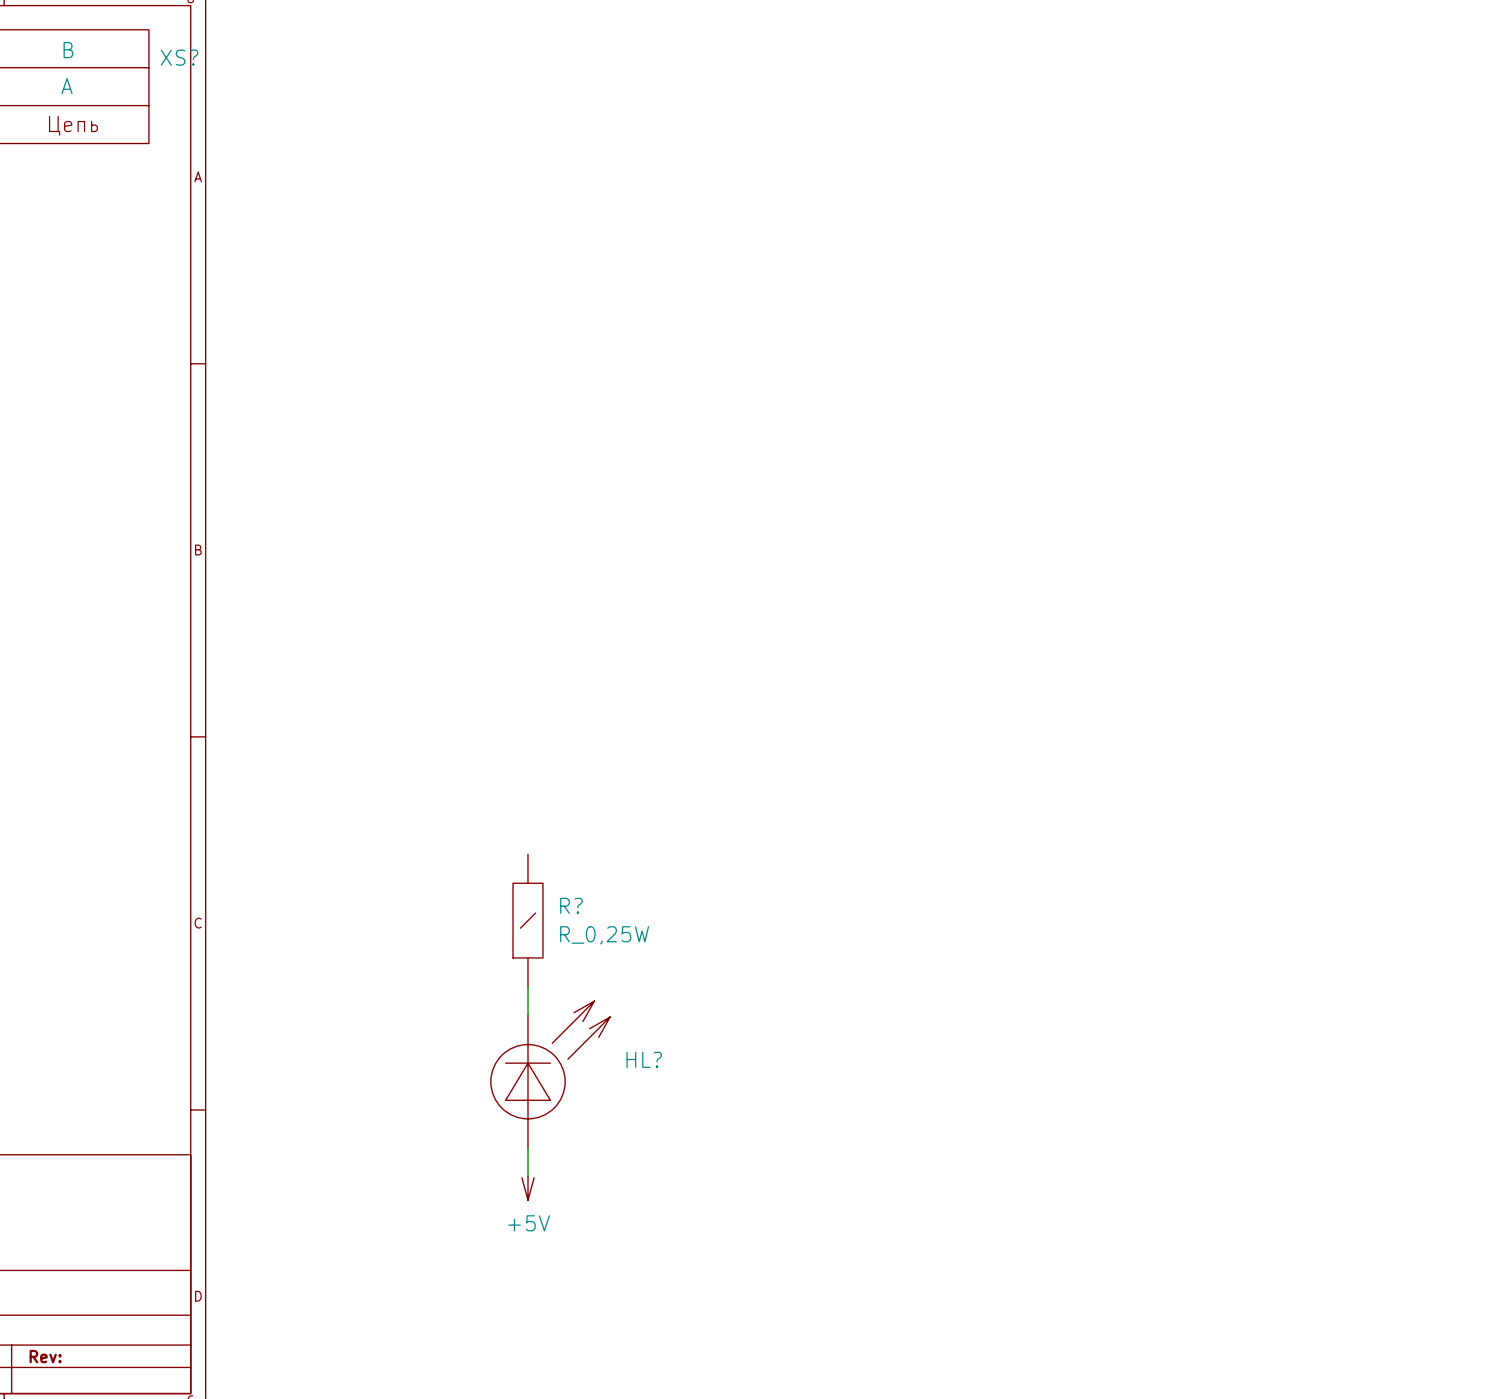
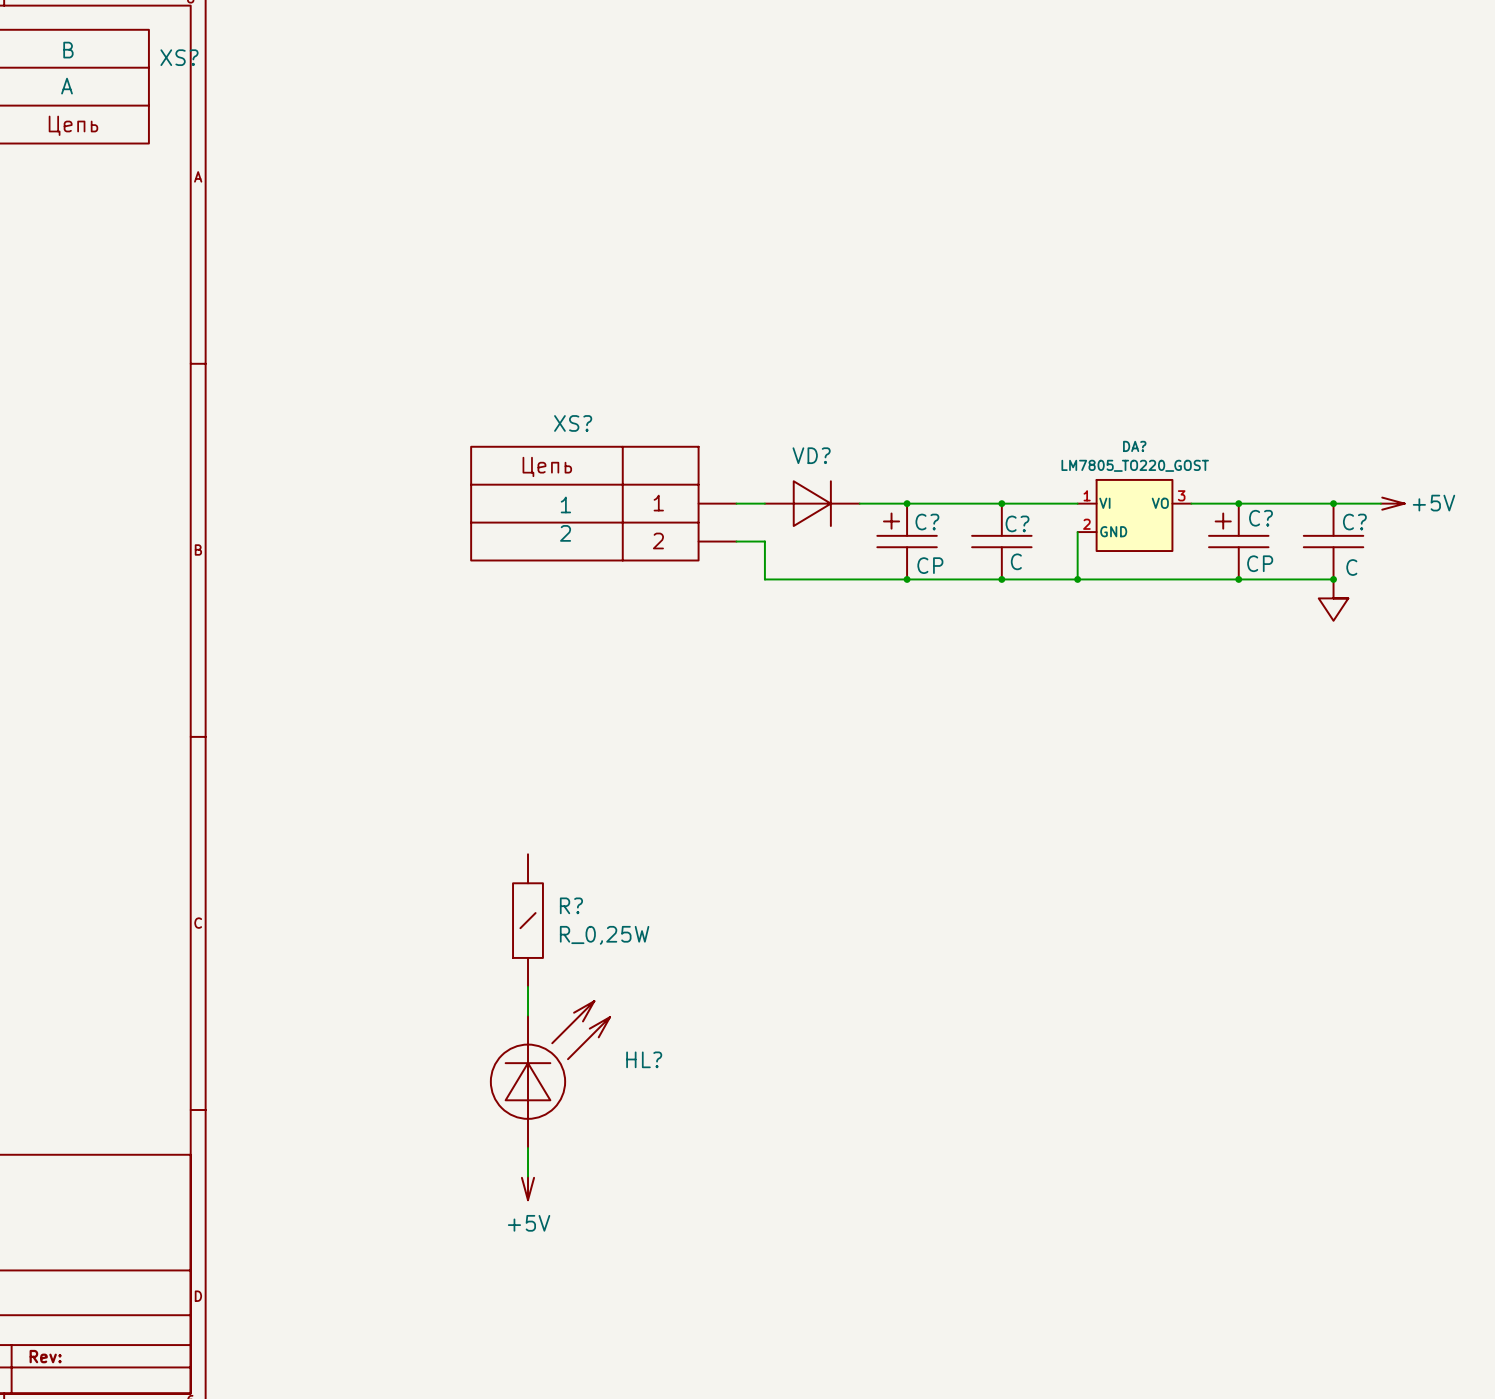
XS?: none -> (603, 503)
wire: none -> (736, 503) (764, 503)
VD?: none -> (812, 503)
wire: none -> (859, 503) (1077, 503)
junction: none -> (907, 503)
junction: none -> (1001, 503)
wire: none -> (1191, 503) (1380, 503)
junction: none -> (1238, 503)
junction: none -> (1333, 503)
power symbol: none -> +5V (1392, 503)
DA?: none -> LM7805_TO220_GOST (1134, 515)
wire: none -> (1077, 532) (1077, 579)
wire: none -> (736, 541) (764, 541) (764, 579) (1333, 579)
C?: none -> CP (907, 541)
C?: none -> C (1001, 541)
C?: none -> CP (1238, 541)
C?: none -> C (1333, 541)
junction: none -> (907, 579)
junction: none -> (1001, 579)
junction: none -> (1077, 579)
junction: none -> (1238, 579)
junction: none -> (1333, 579)
power symbol: none -> (1333, 600)

